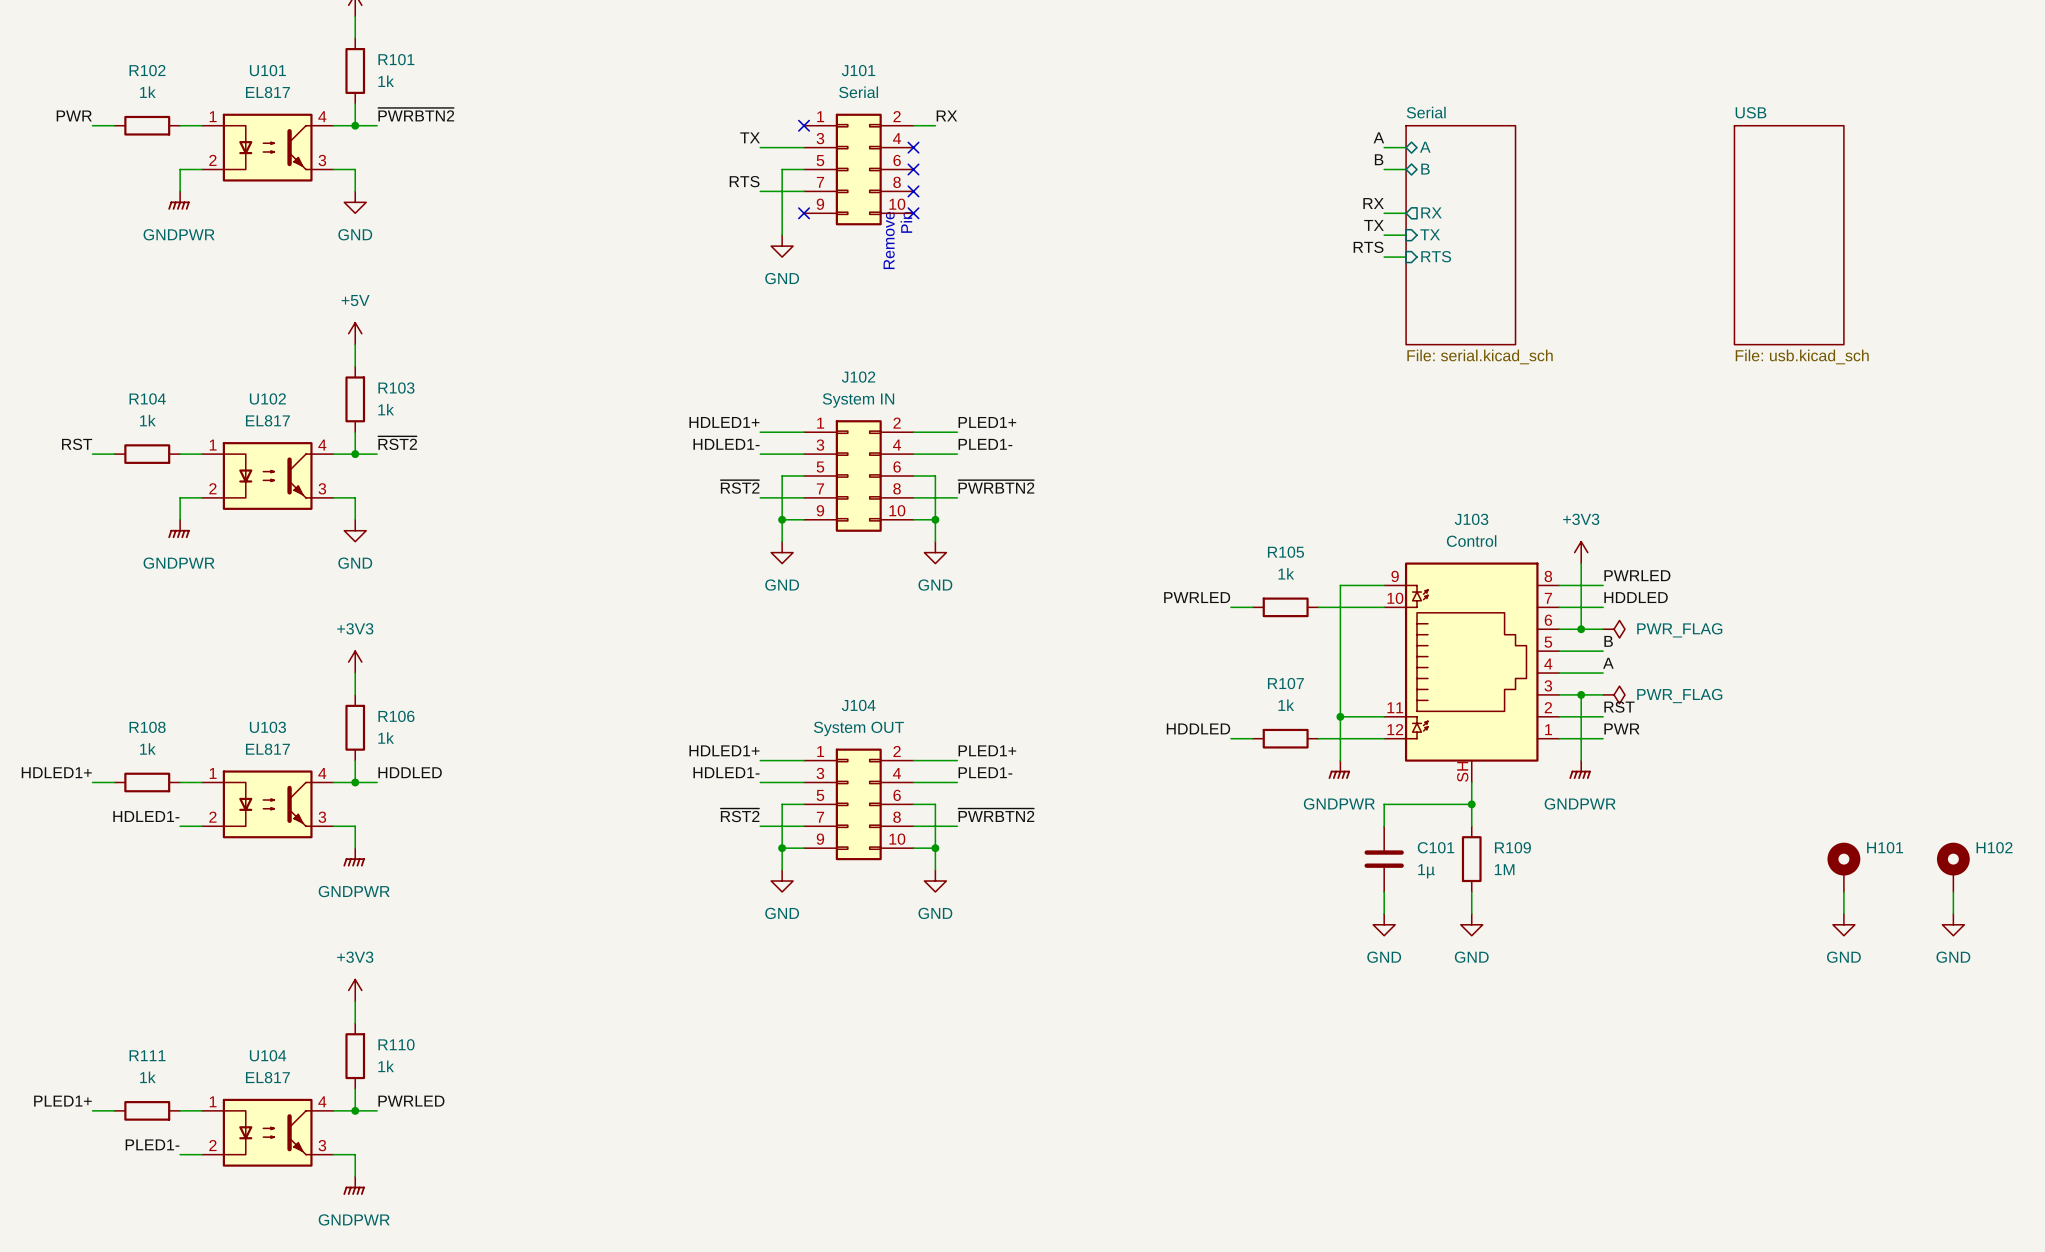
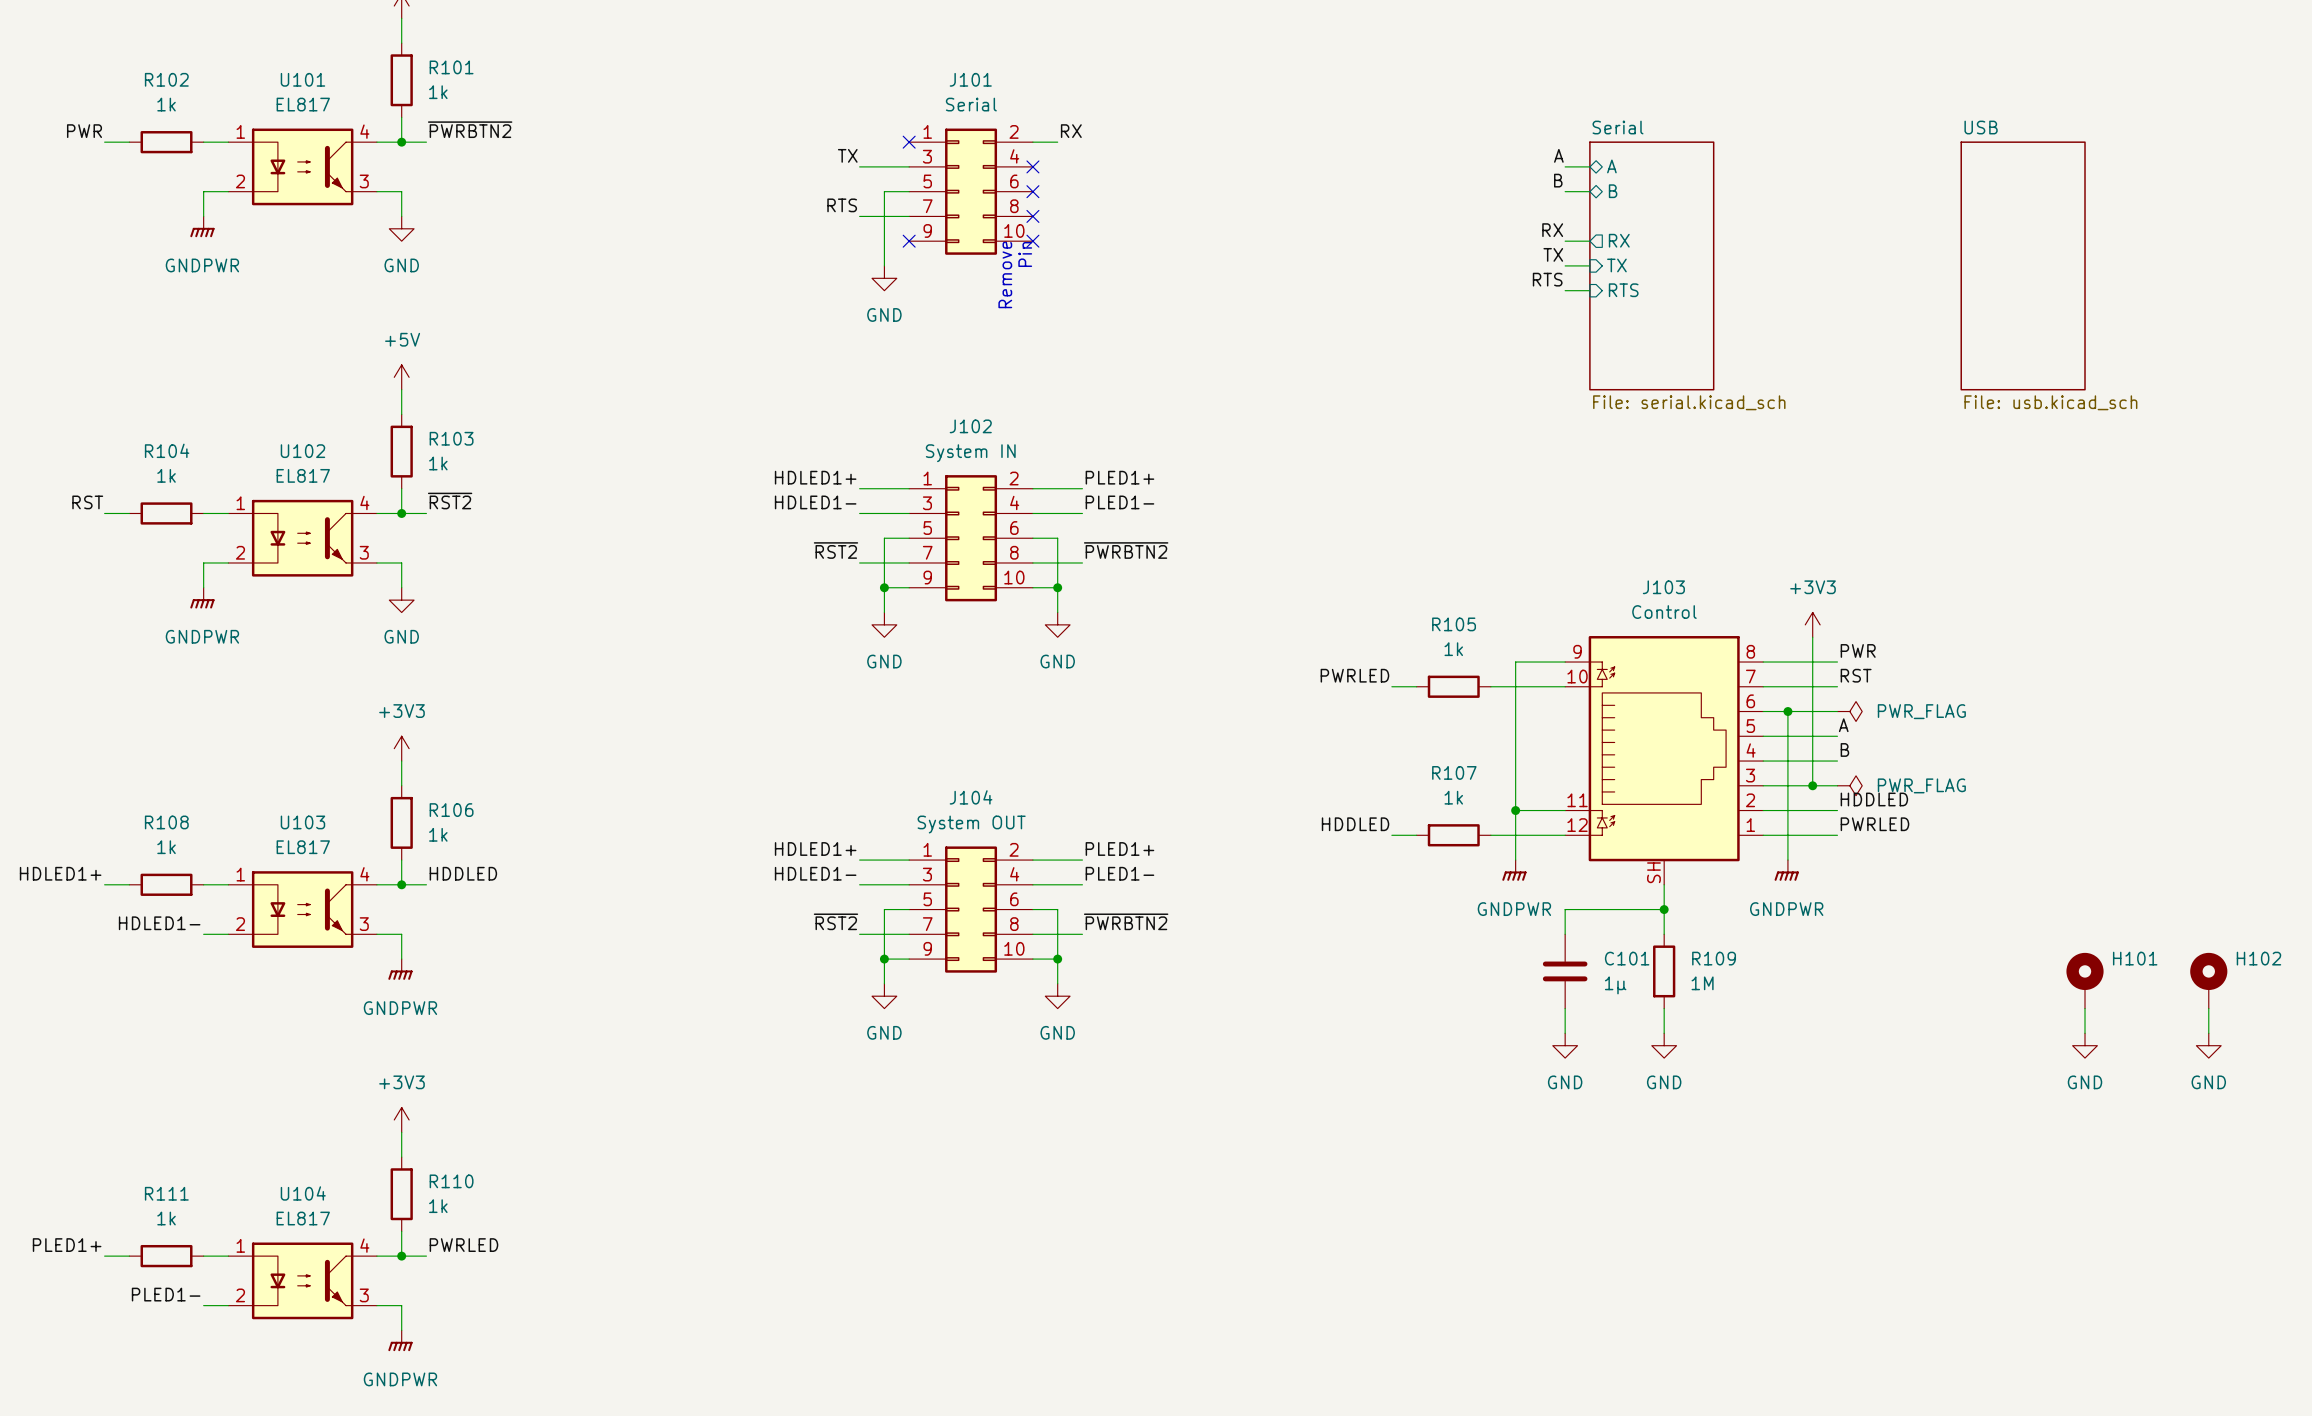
power symbol position: +3V3 (1581, 552) -> +3V3 (1812, 624)
wire: (1581, 563) (1581, 629) -> (1787, 785) (1787, 711)
wire: none -> (1812, 637) (1812, 785) (1837, 785)
label position: PWRLED (1637, 575) -> PWRLED (1874, 824)
wire: none -> (1812, 662) (1837, 662)
label position: HDDLED (1636, 597) -> HDDLED (1874, 799)
wire: none -> (1812, 686) (1837, 686)
power symbol position: PWR_FLAG (1614, 629) -> PWR_FLAG (1849, 711)
label position: B (1608, 641) -> B (1844, 749)
wire: none -> (1812, 736) (1837, 736)
label position: A (1608, 663) -> A (1843, 725)
wire: none -> (1812, 761) (1837, 761)
junction position: (1581, 694) -> (1812, 785)
power symbol position: PWR_FLAG (1614, 694) -> PWR_FLAG (1849, 785)
label position: RST (1619, 707) -> RST (1856, 675)
wire: none -> (1812, 810) (1837, 810)
label position: PWR (1621, 728) -> PWR (1858, 650)
wire: none -> (1812, 835) (1837, 835)

